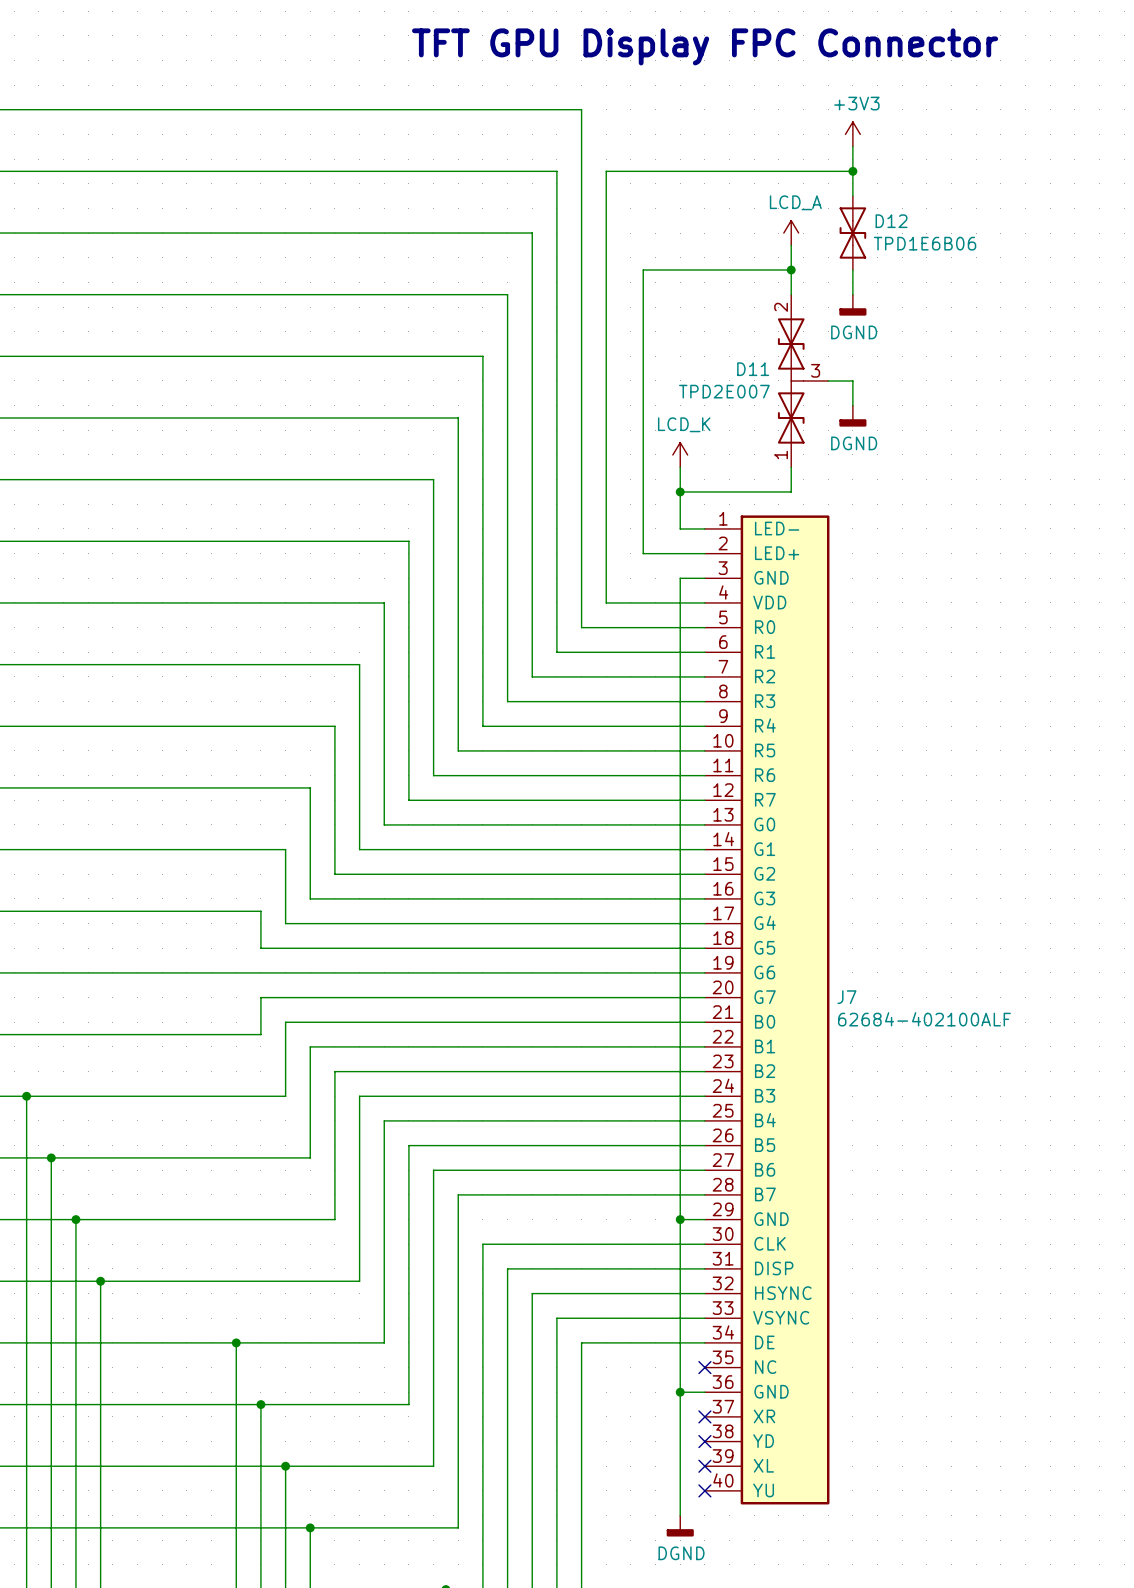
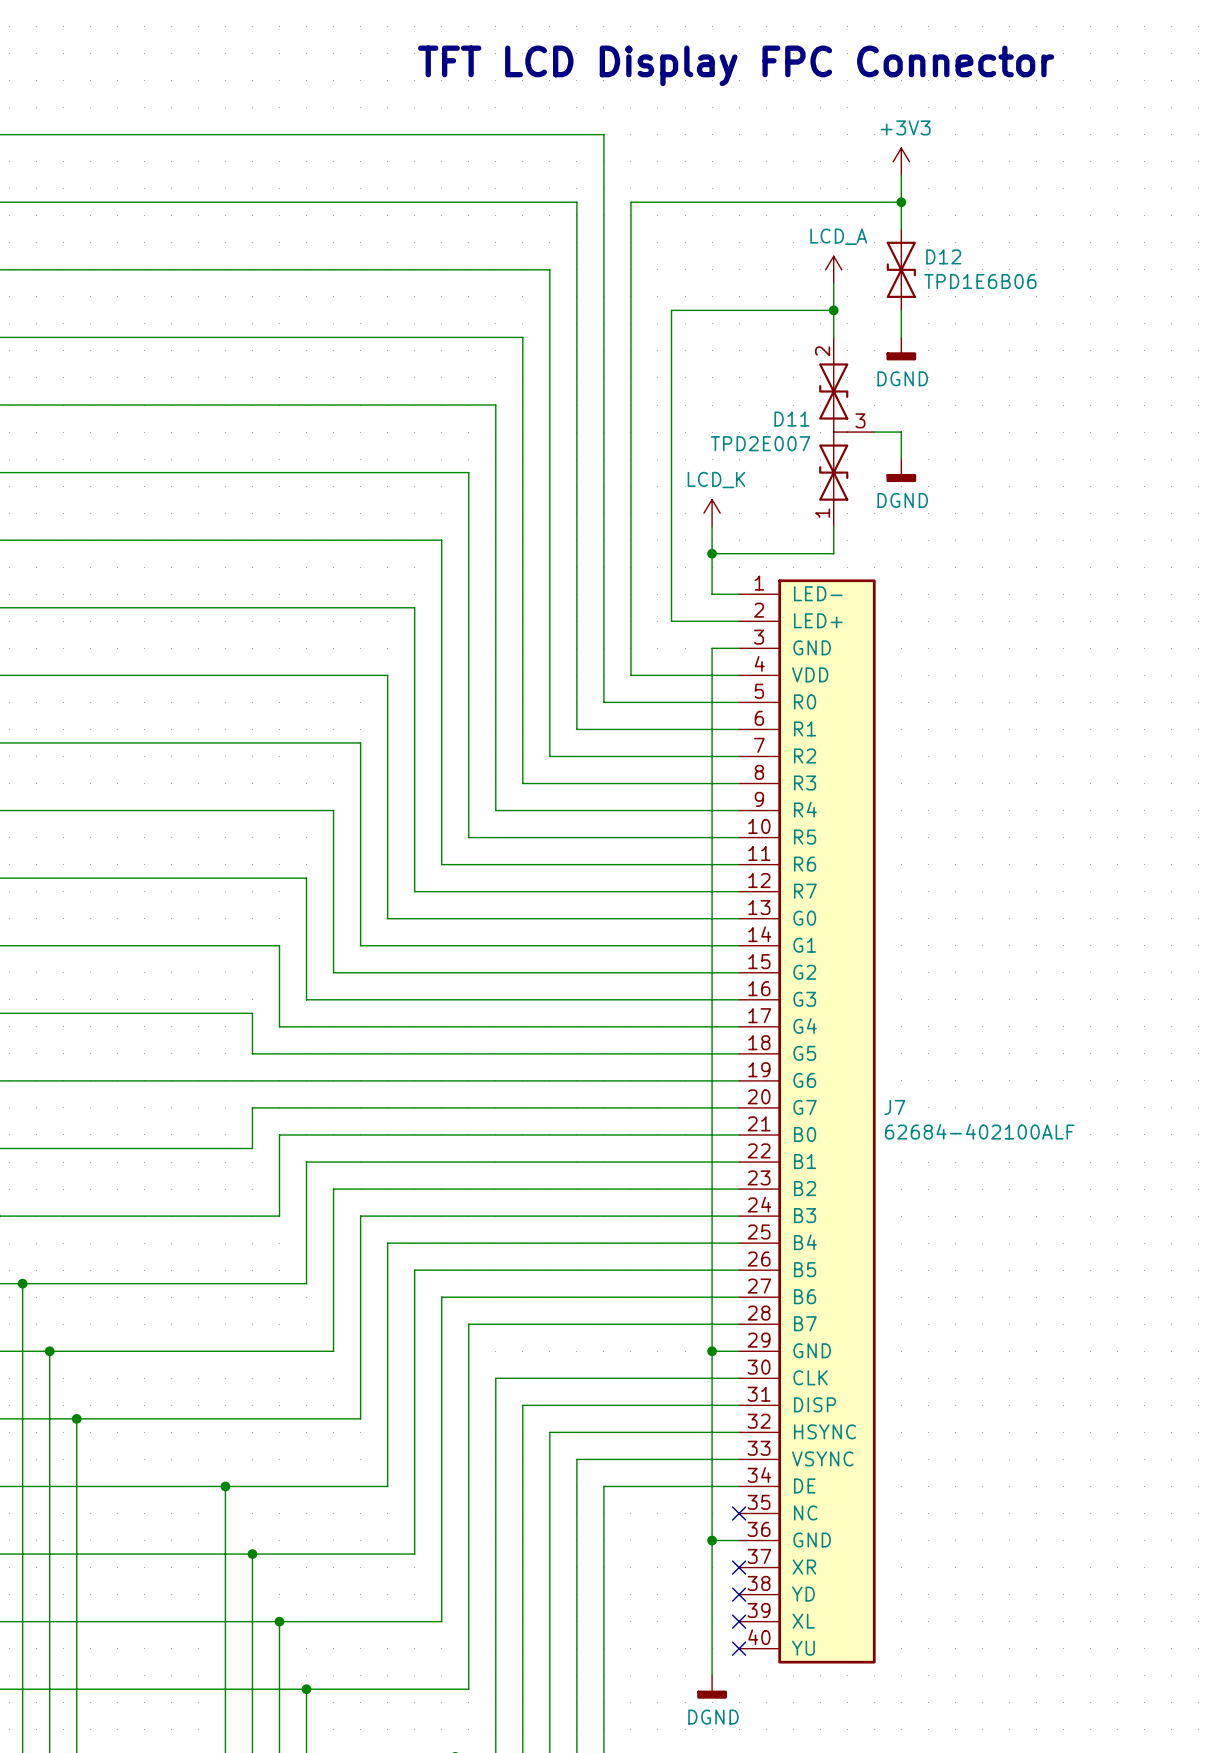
text: TFT GPU Display FPC Connector (705, 46) -> TFT LCD Display FPC Connector (736, 65)

